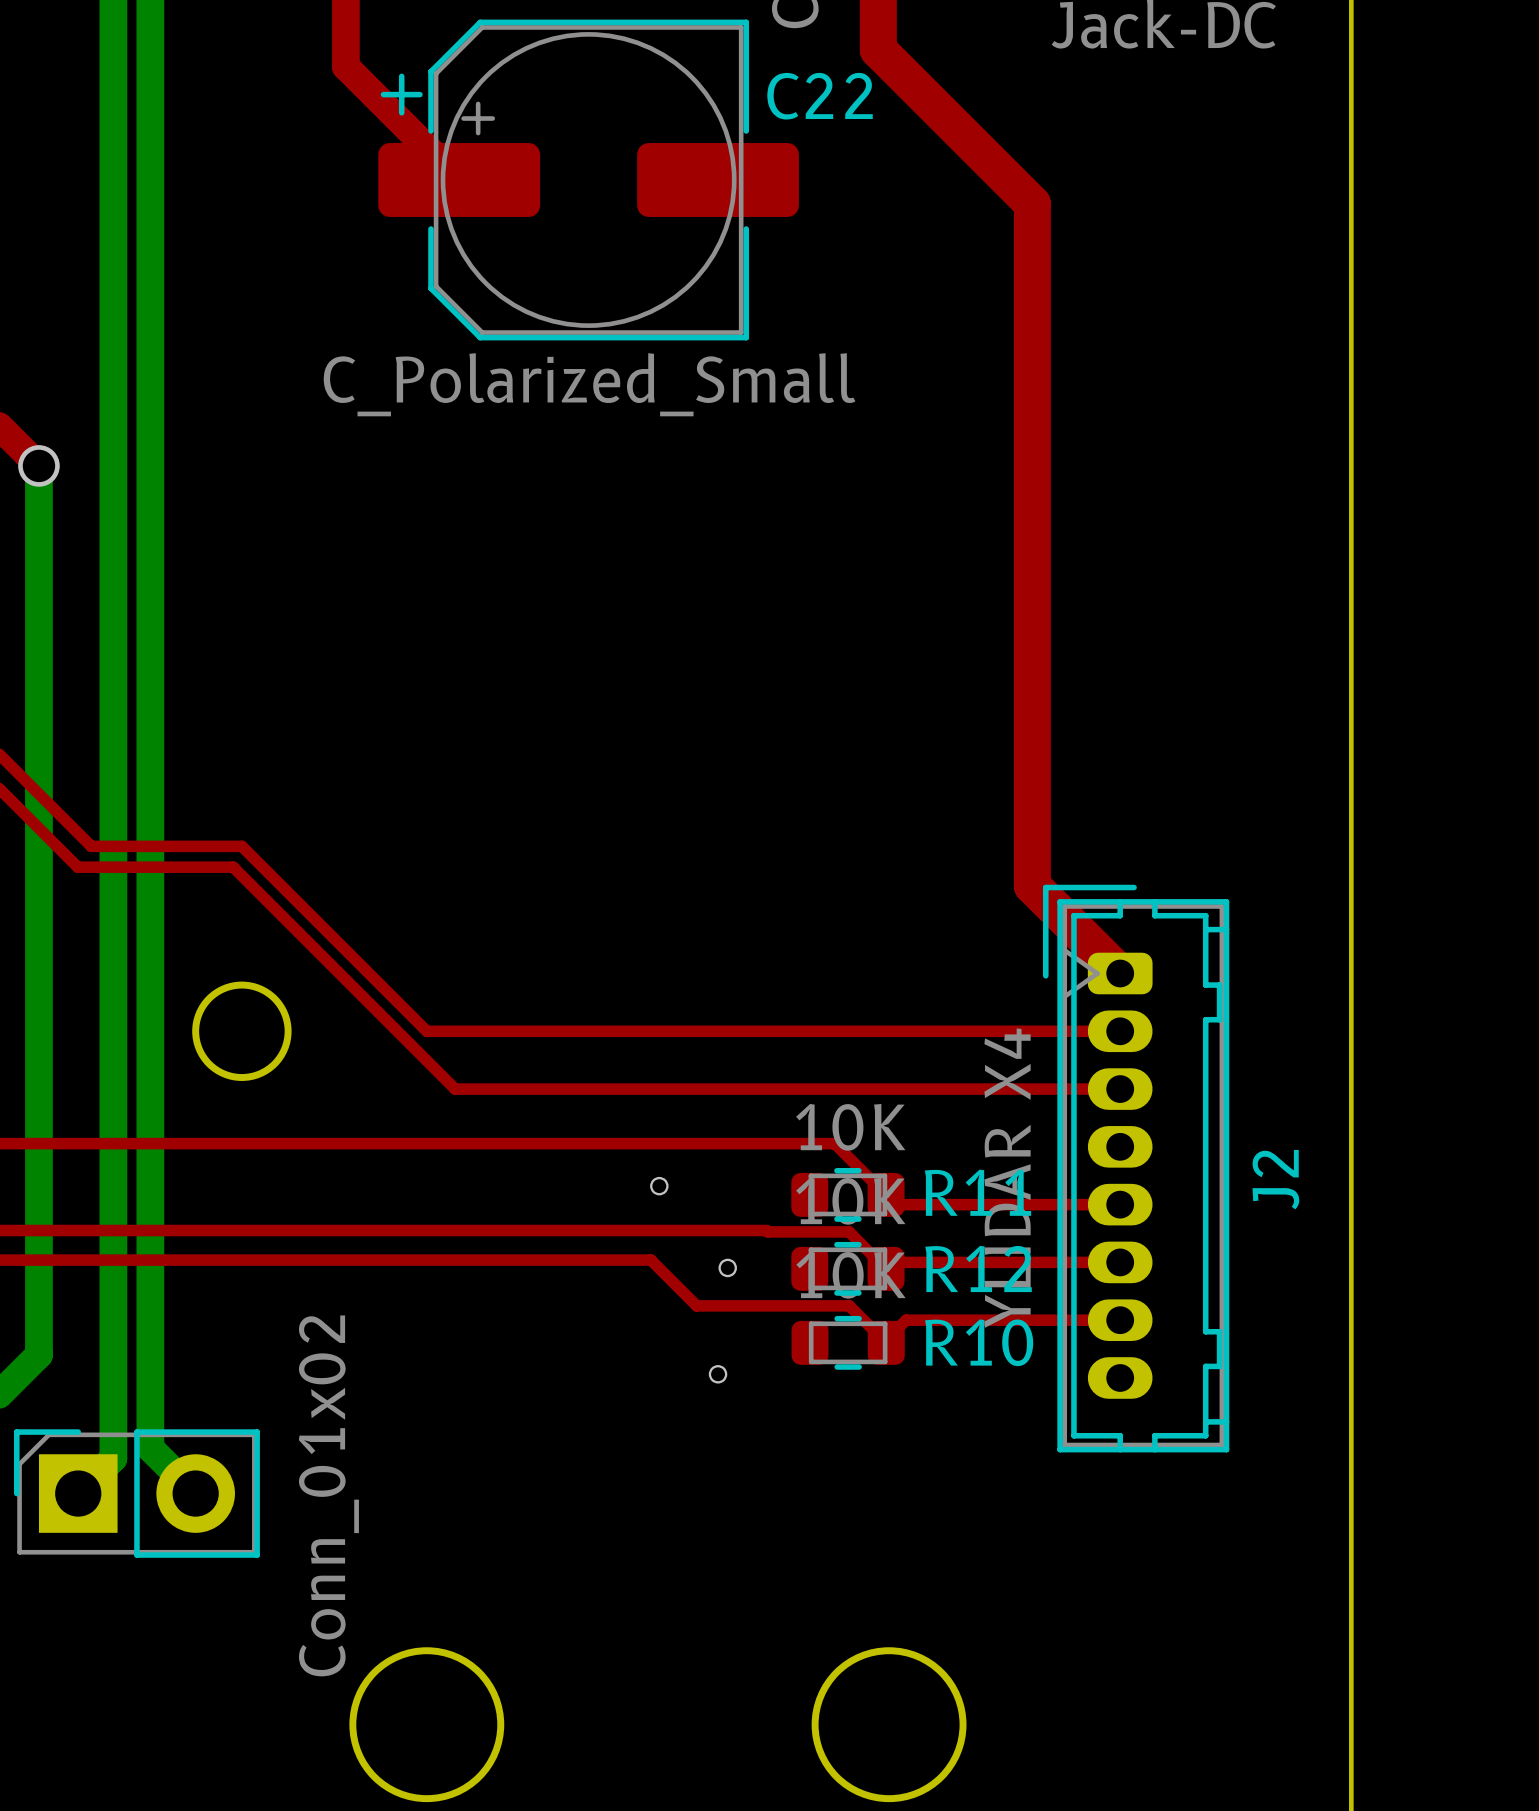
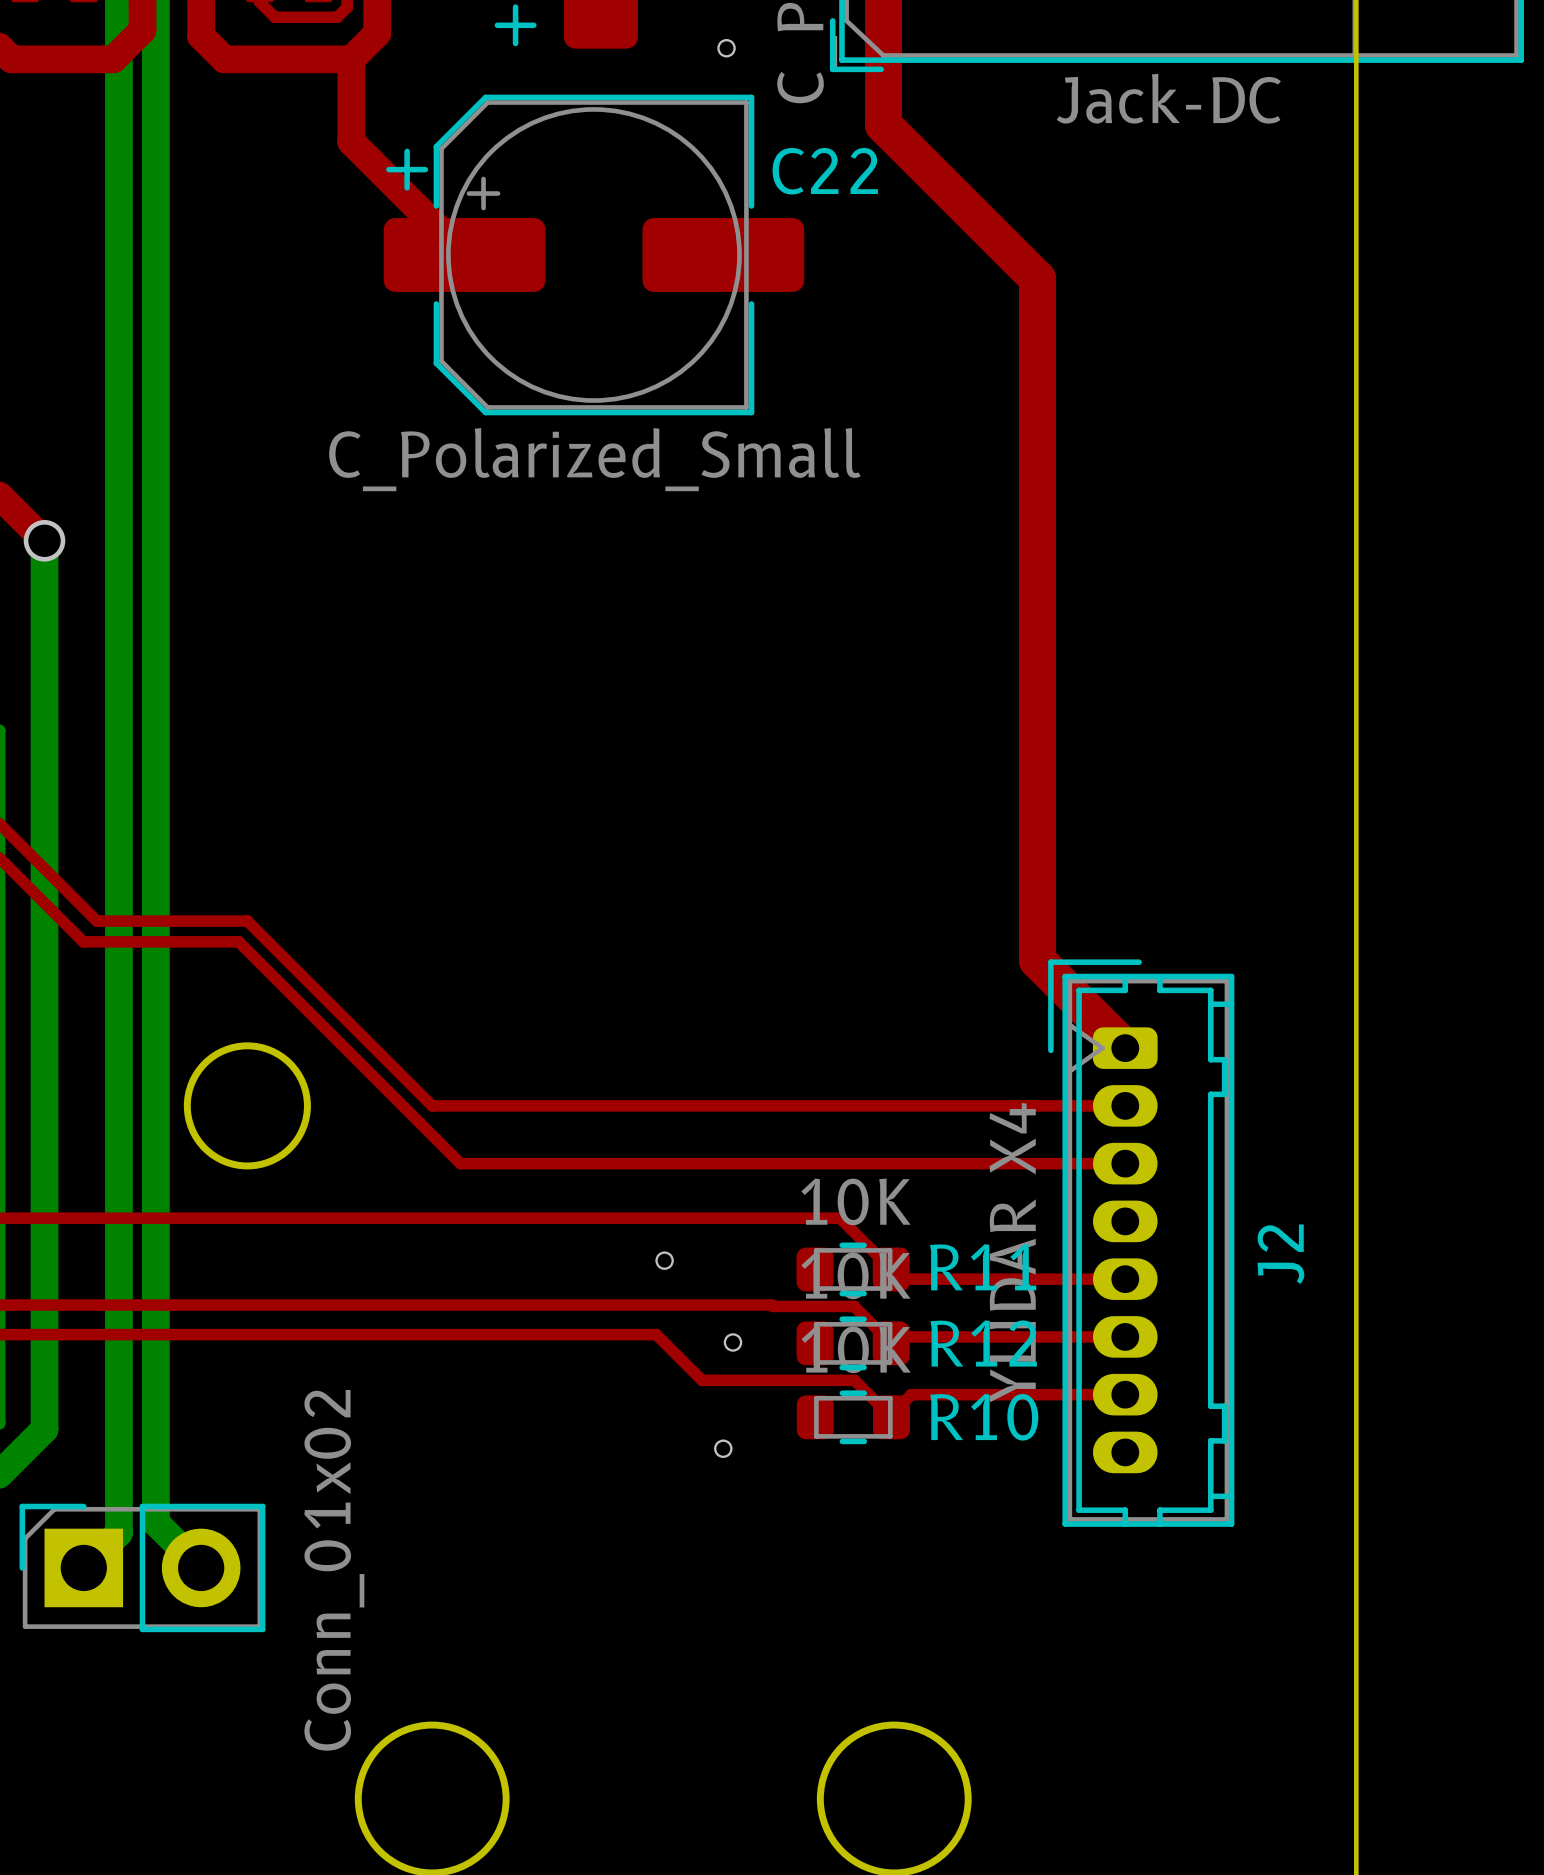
round board edge size: [192, 981, 292, 1081] -> [183, 1042, 311, 1170]

